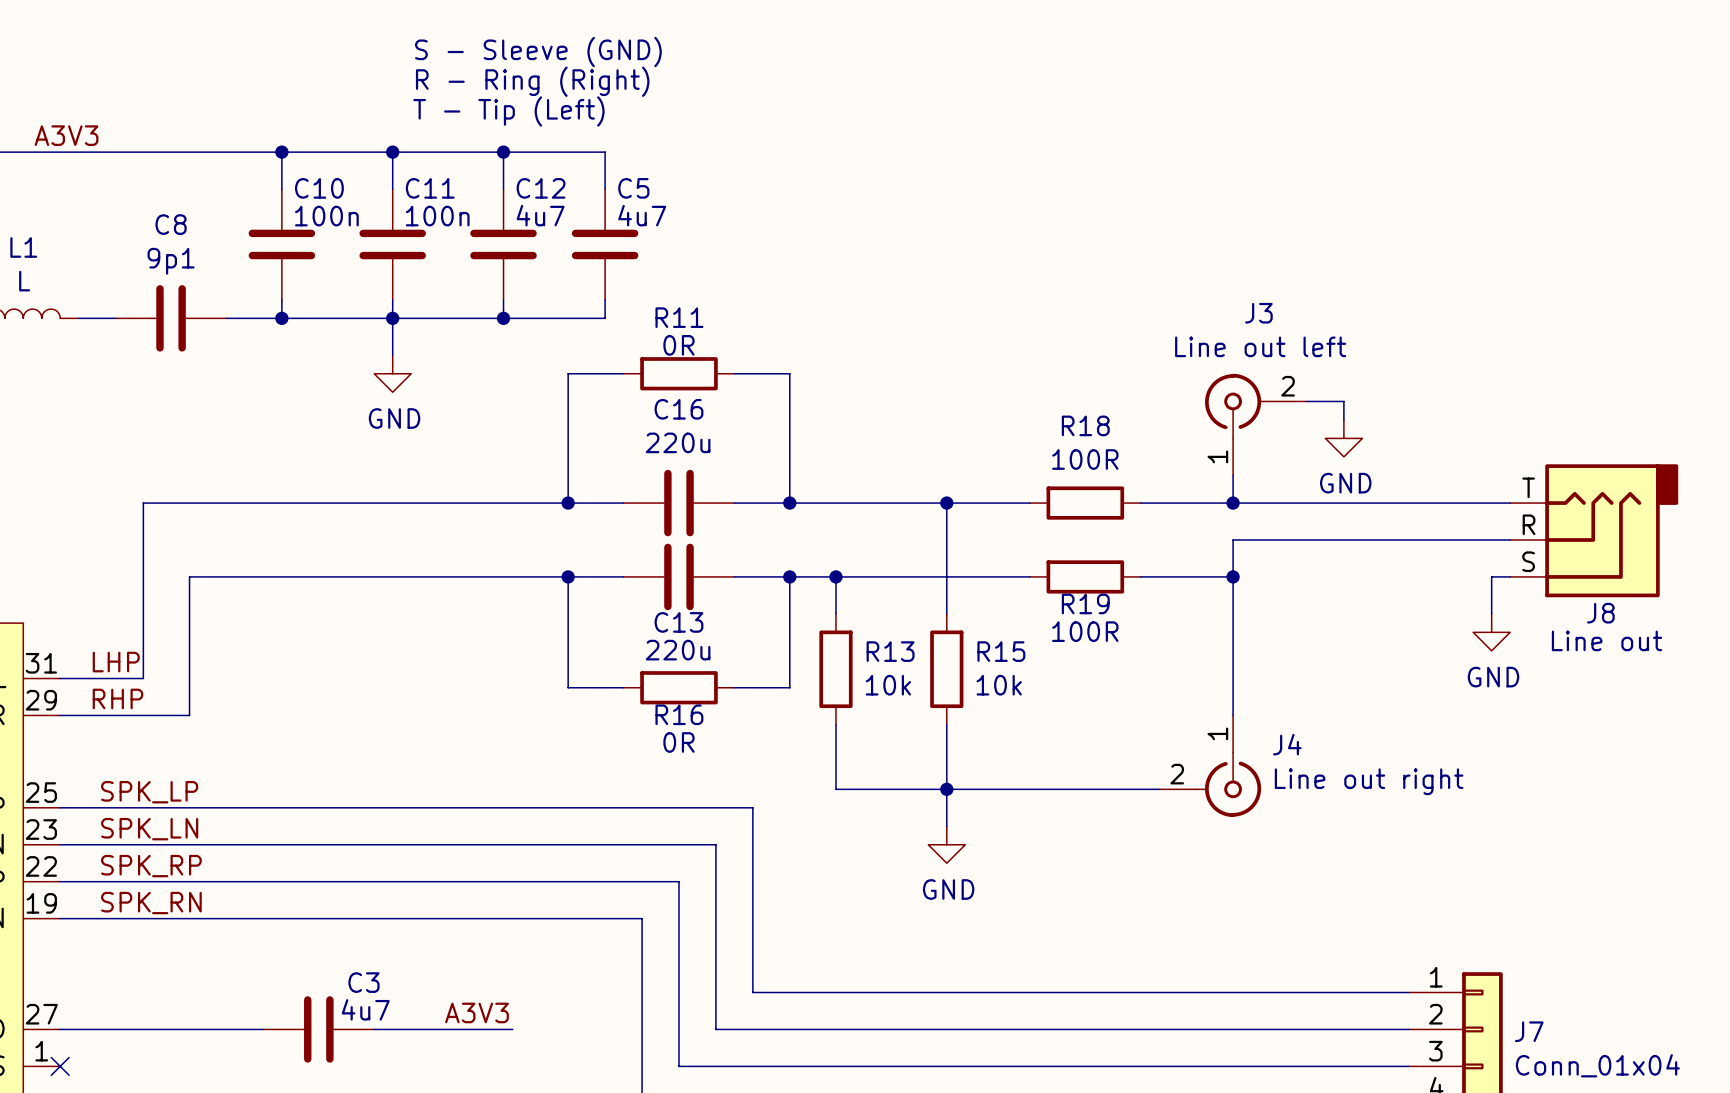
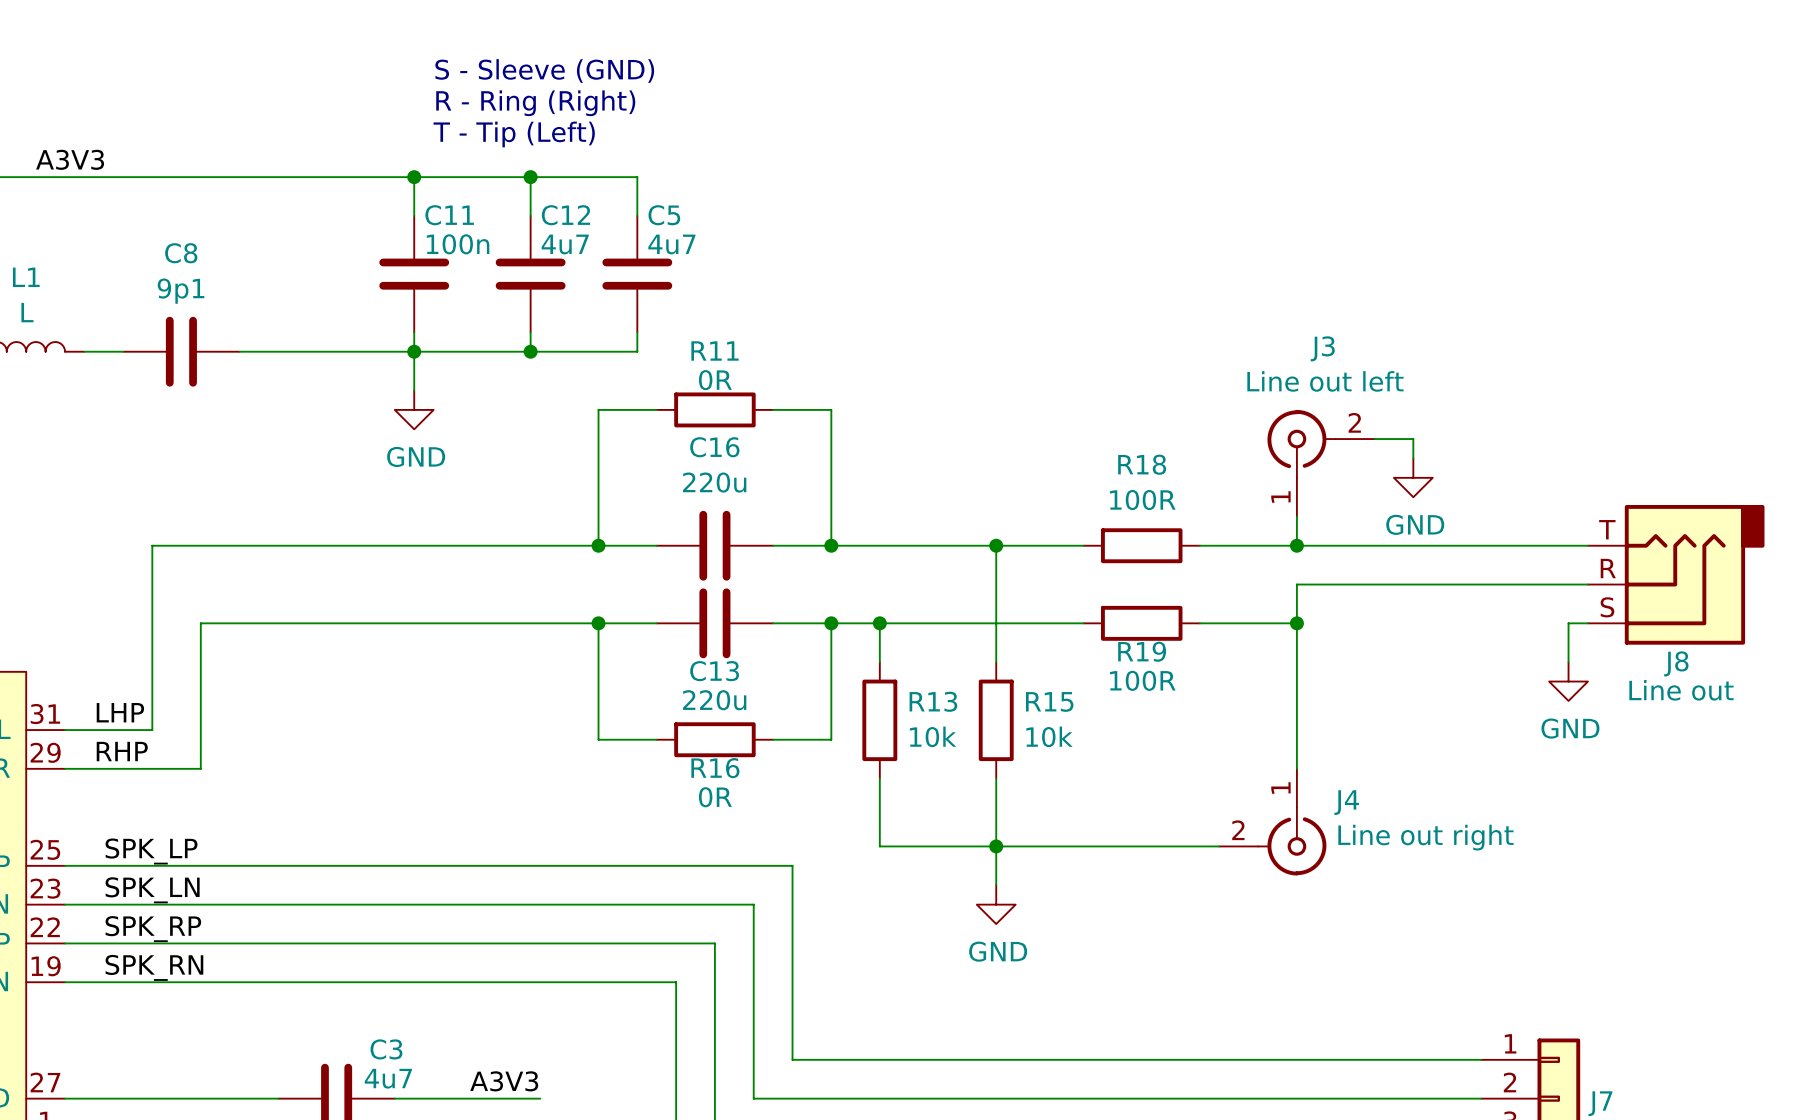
wire: (281, 152) (281, 189) -> none
junction: (281, 152) -> none
C10: 100n (281, 244) -> none
wire: (281, 299) (281, 318) -> none
junction: (281, 318) -> none

